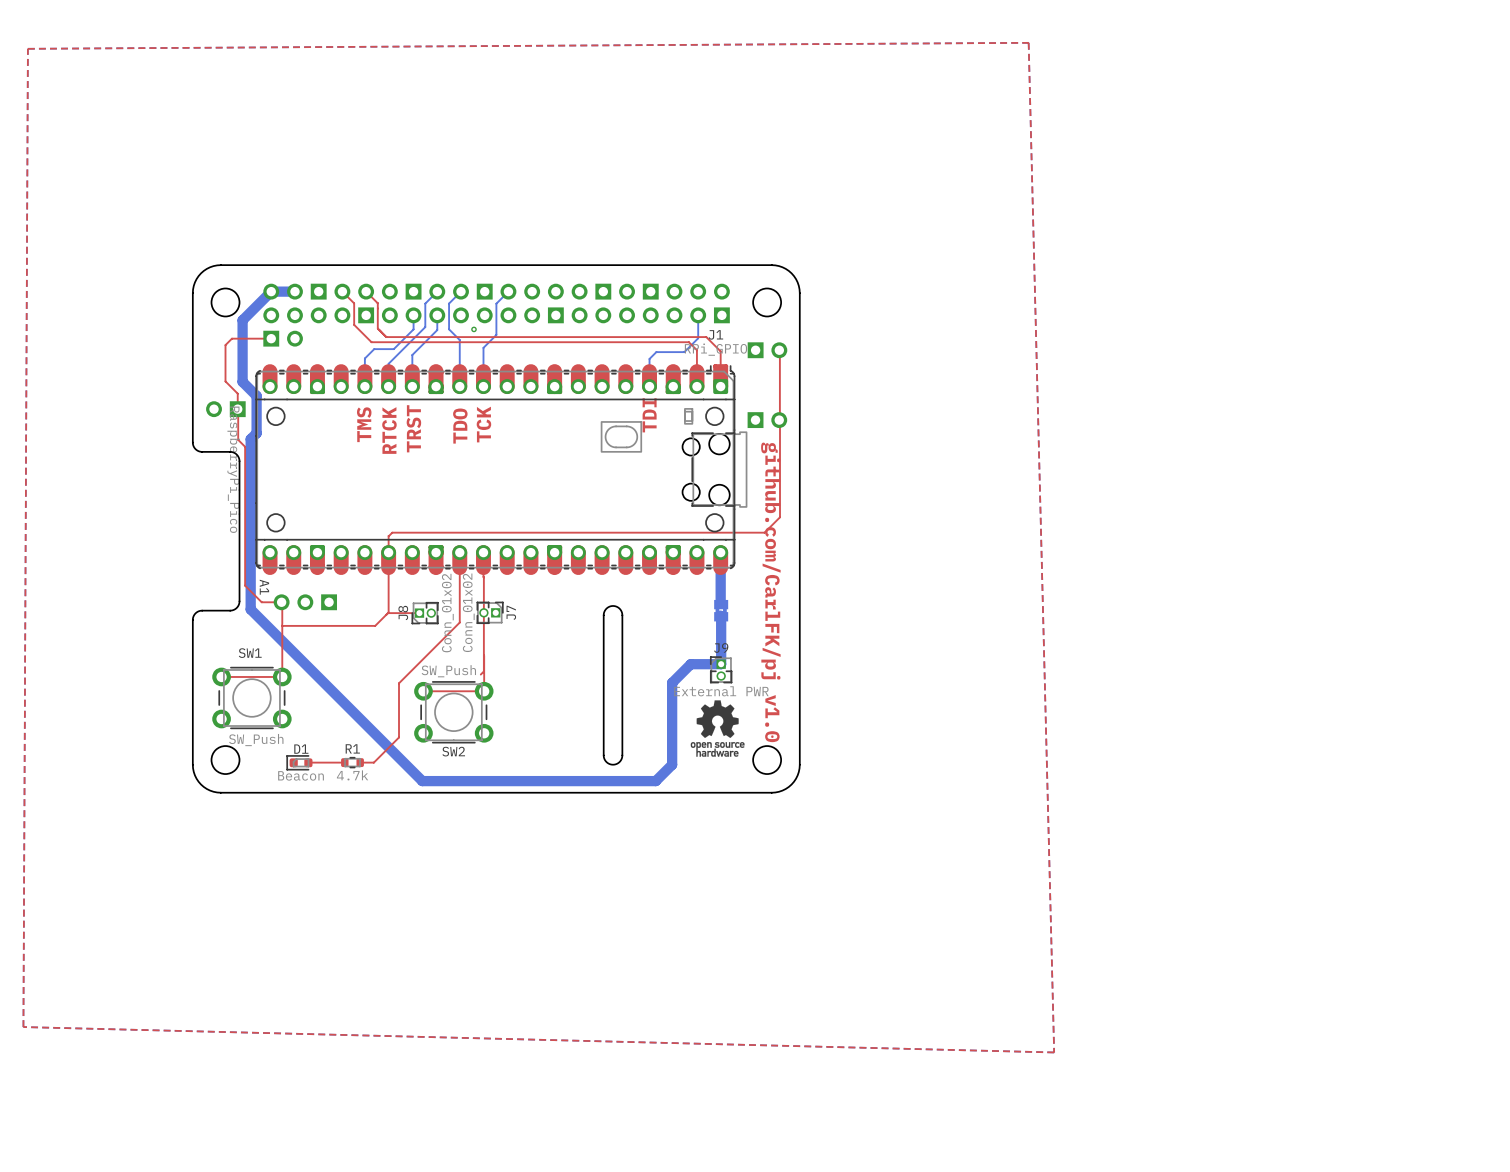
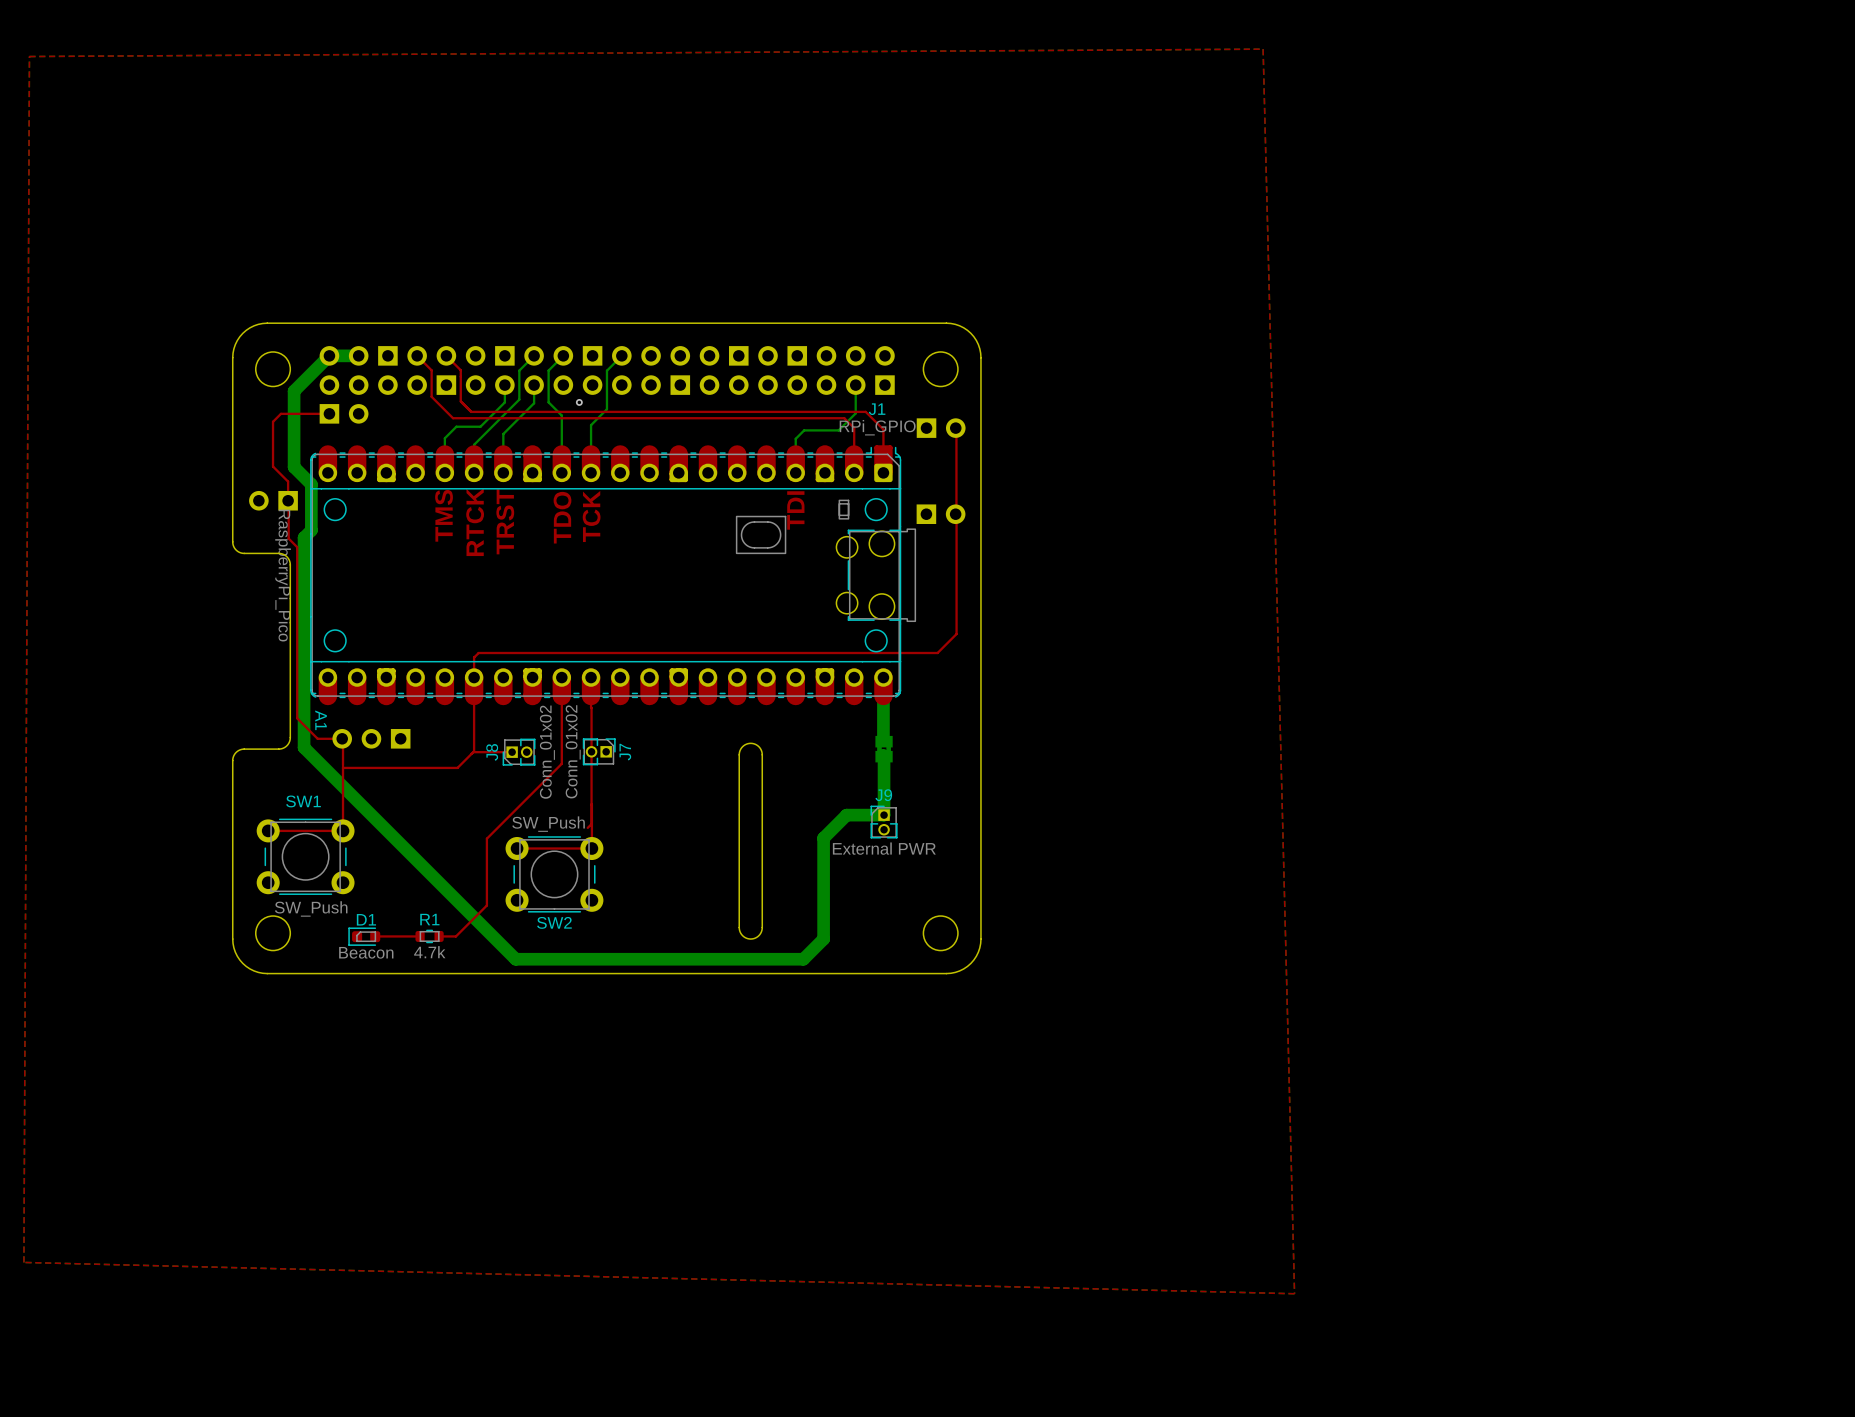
text: github.com/CarlFK/pj v1.0 (770, 592) -> none
drawing: [690, 700, 745, 757] -> none

